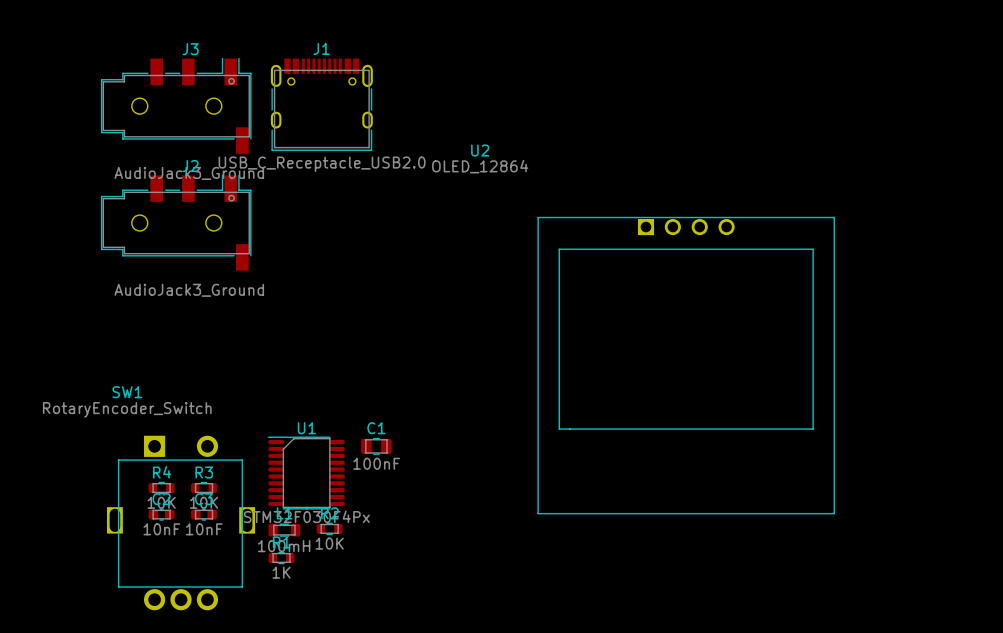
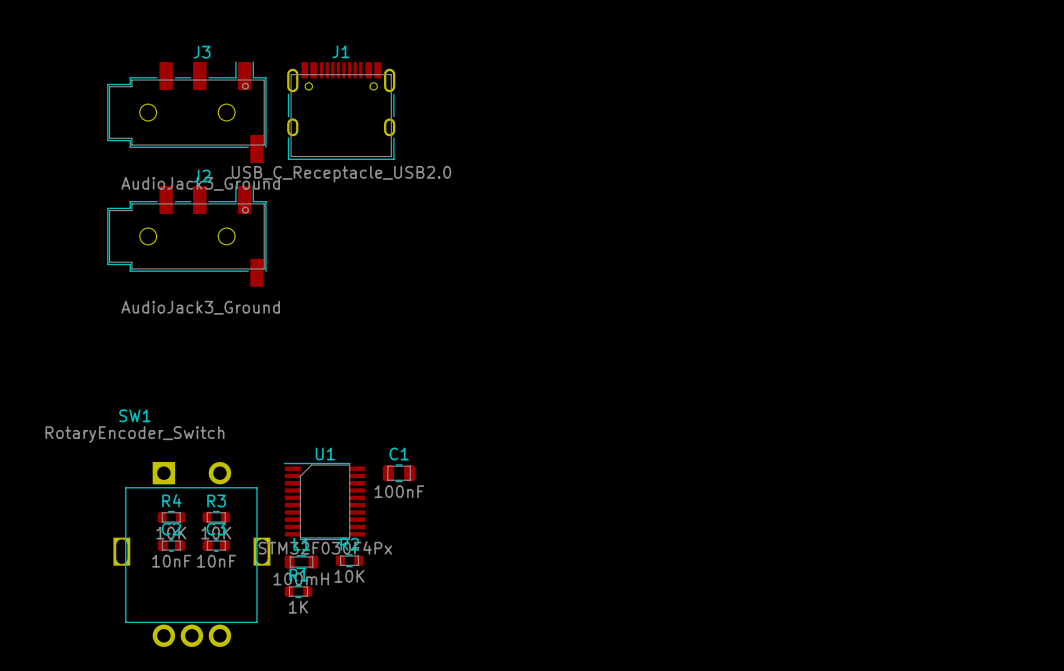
U2: OLED_12864 (686, 365) -> none

